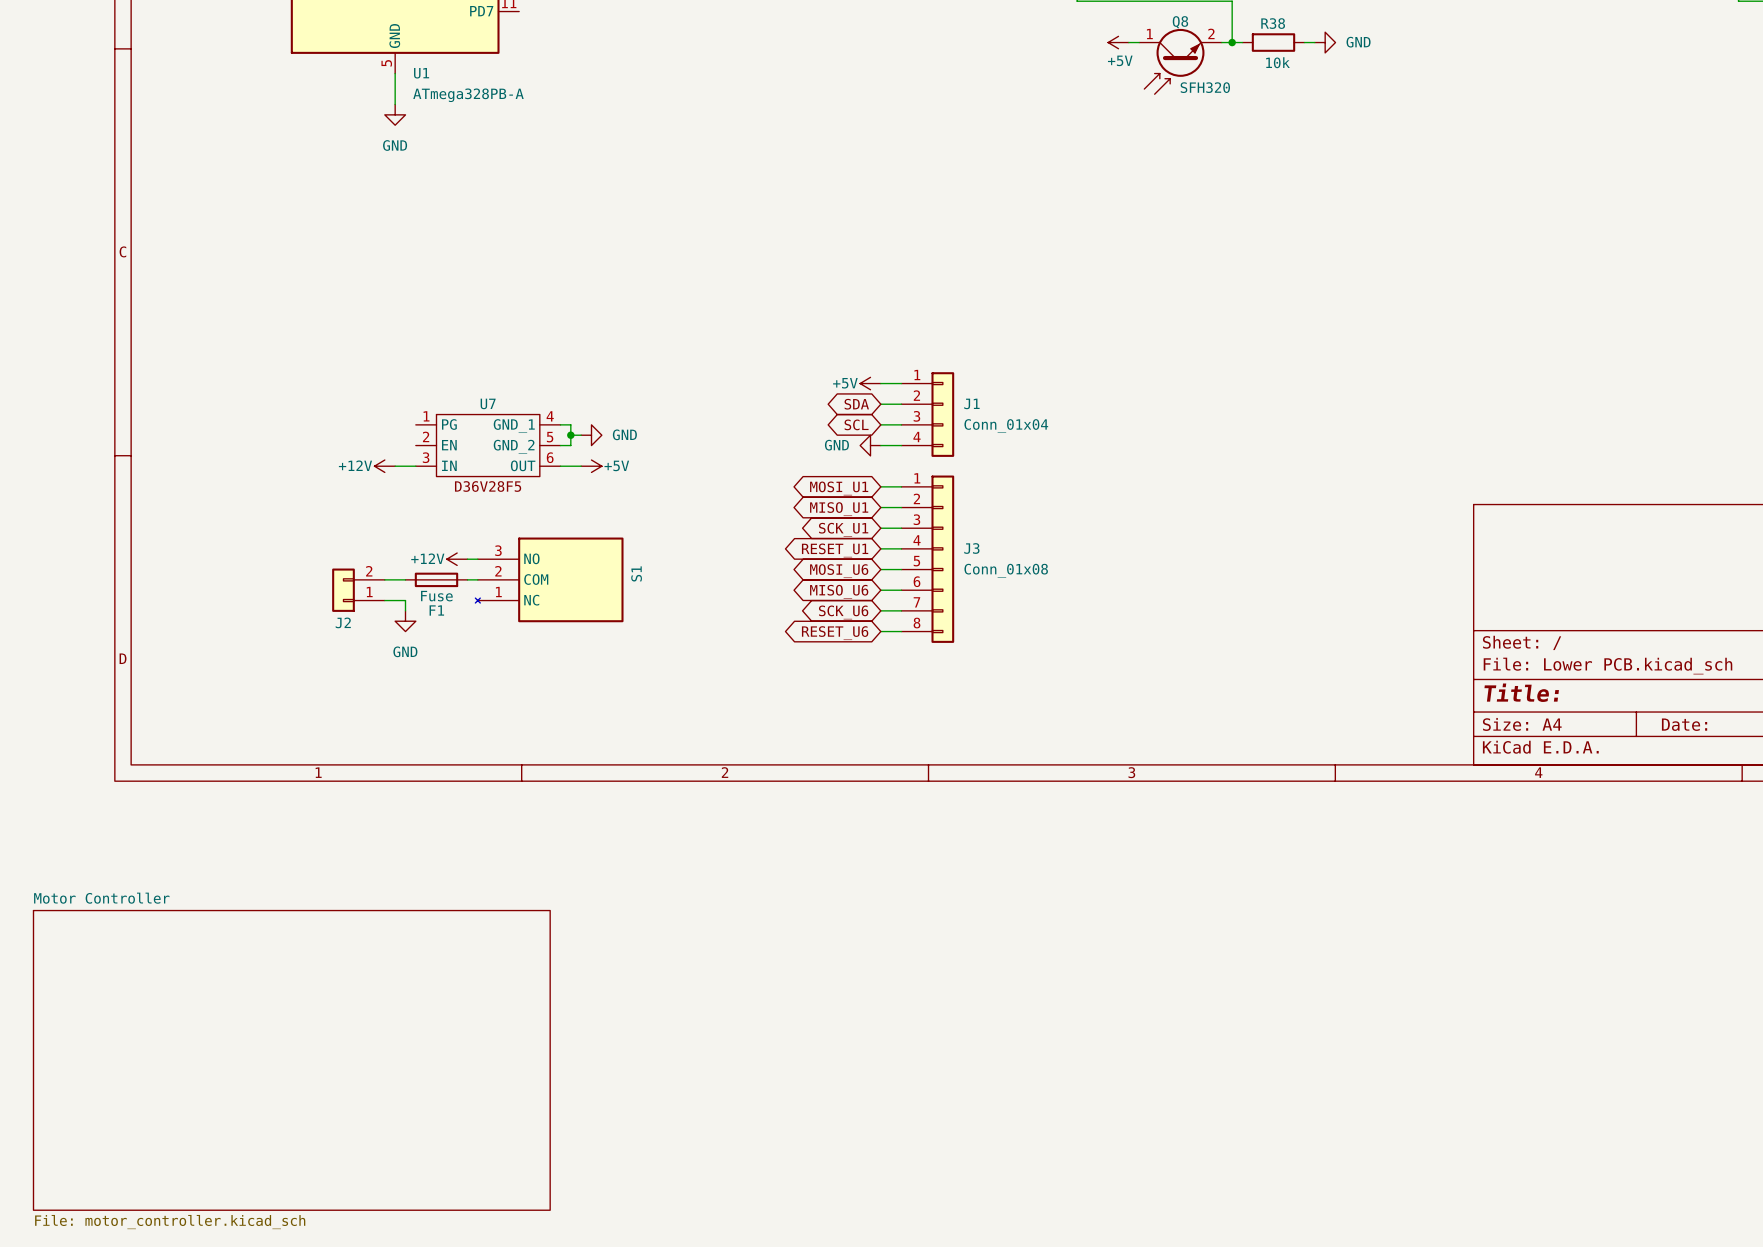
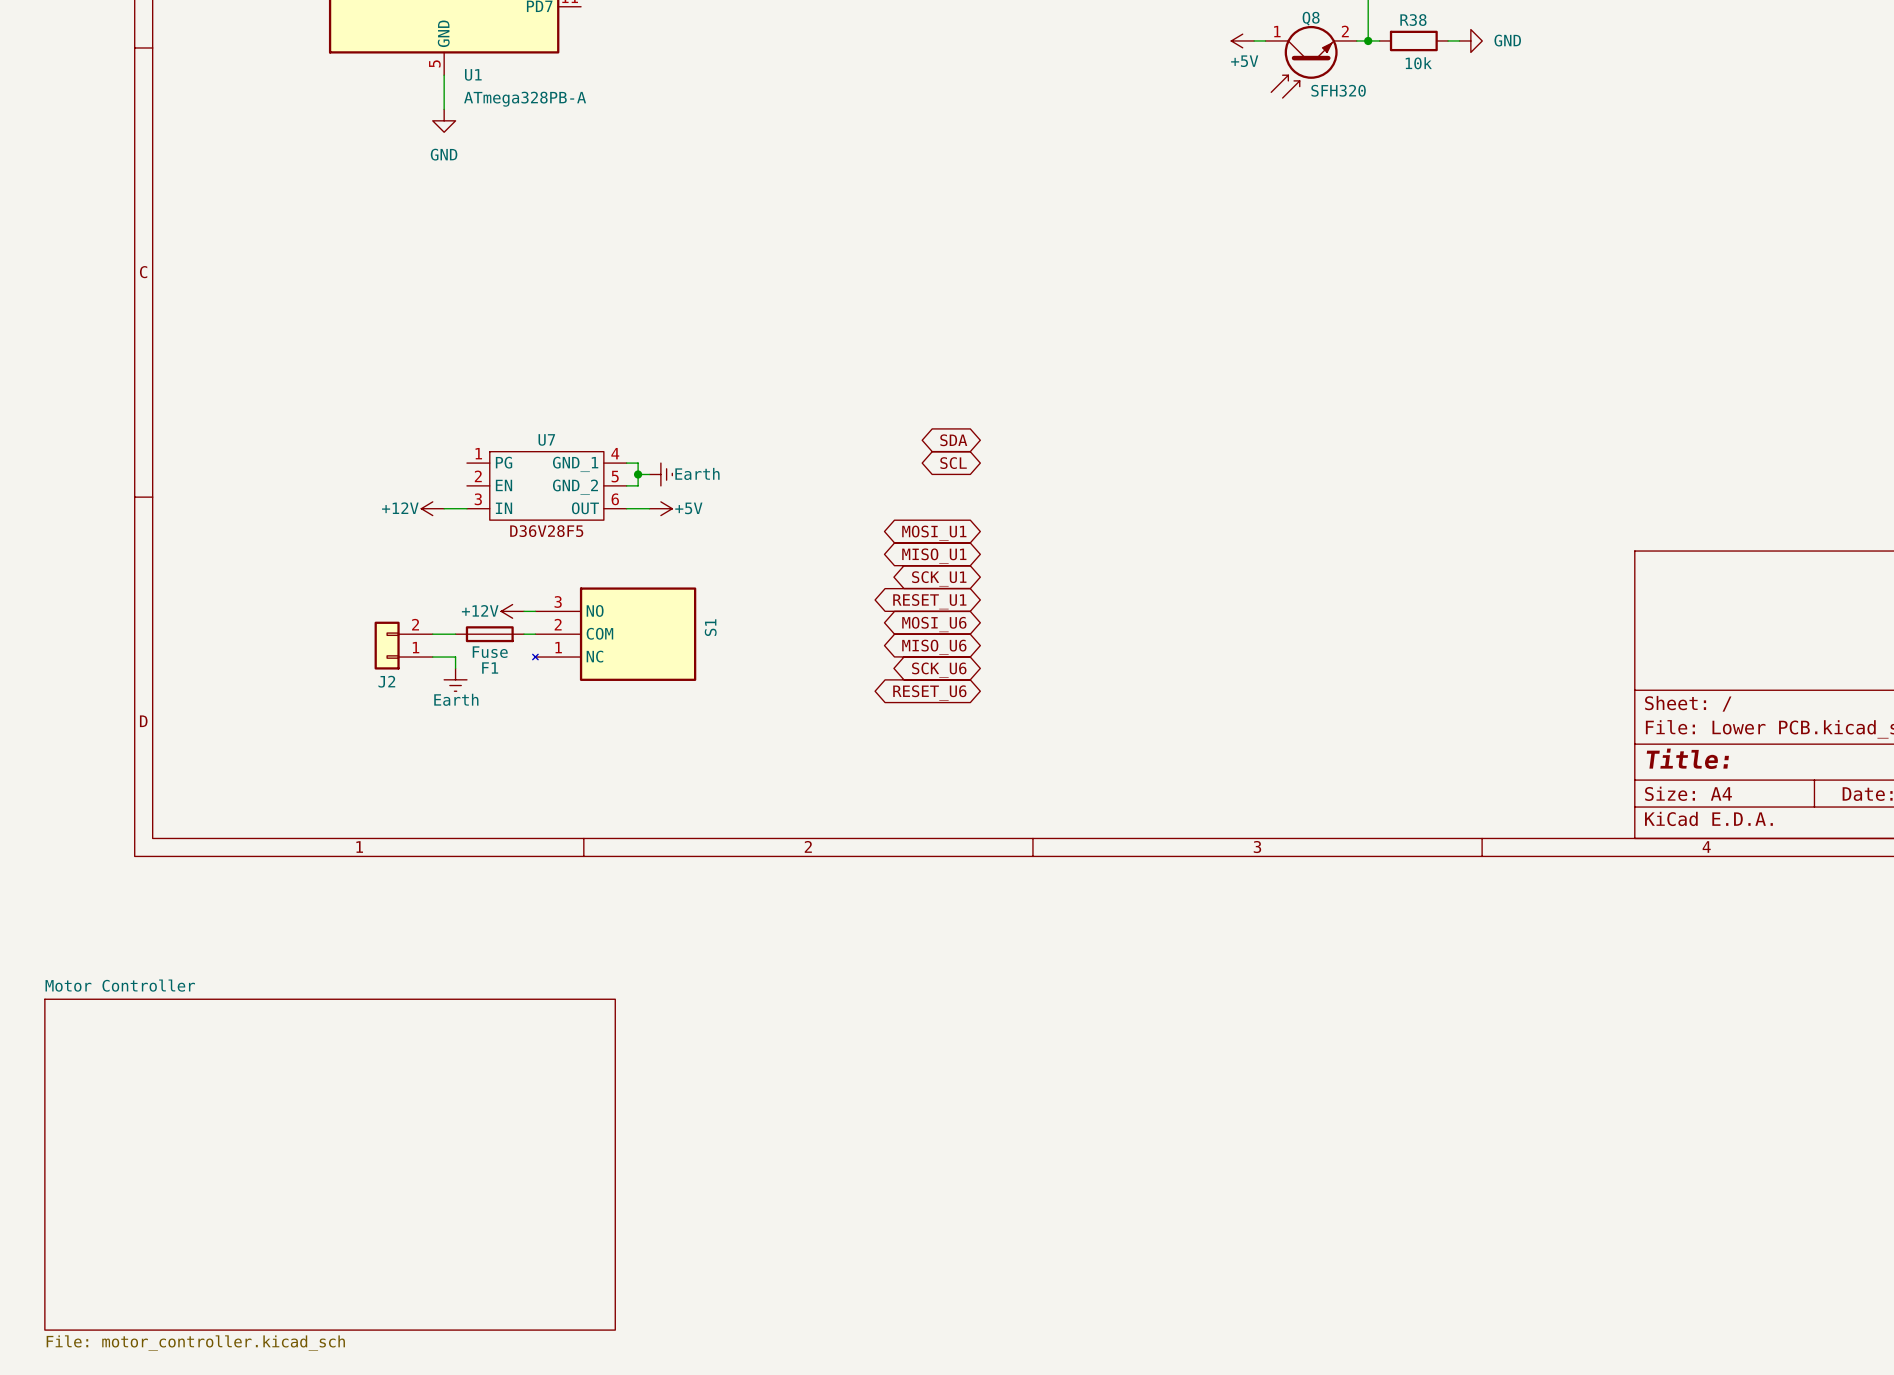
power symbol: +5V (870, 383) -> none
wire: (880, 383) (901, 383) -> none
wire: (880, 404) (901, 404) -> none
J1: Conn_01x04 (927, 414) -> none
wire: (880, 424) (901, 424) -> none
power symbol: GND (591, 435) -> Earth (660, 474)
power symbol: GND (870, 445) -> none
wire: (880, 445) (901, 445) -> none
wire: (880, 486) (901, 486) -> none
wire: (880, 507) (901, 507) -> none
wire: (880, 528) (901, 528) -> none
wire: (880, 548) (901, 548) -> none
J3: Conn_01x08 (927, 559) -> none
wire: (880, 569) (901, 569) -> none
wire: (880, 590) (901, 590) -> none
wire: (880, 610) (901, 610) -> none
power symbol: GND (405, 621) -> Earth (455, 679)
wire: (880, 631) (901, 631) -> none

